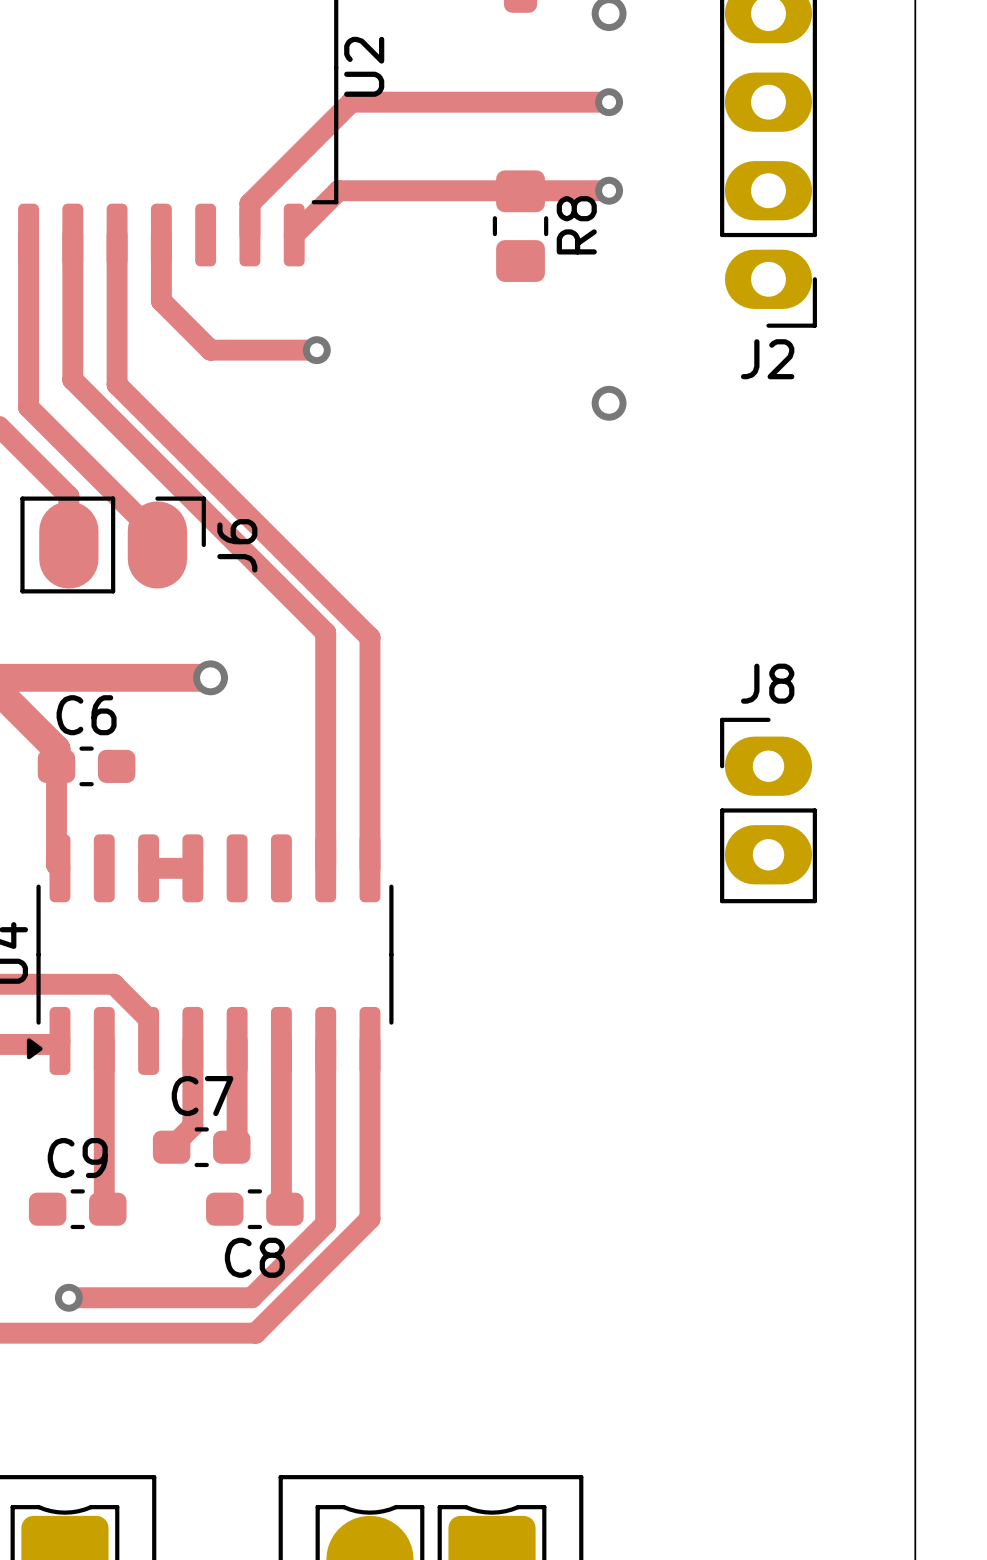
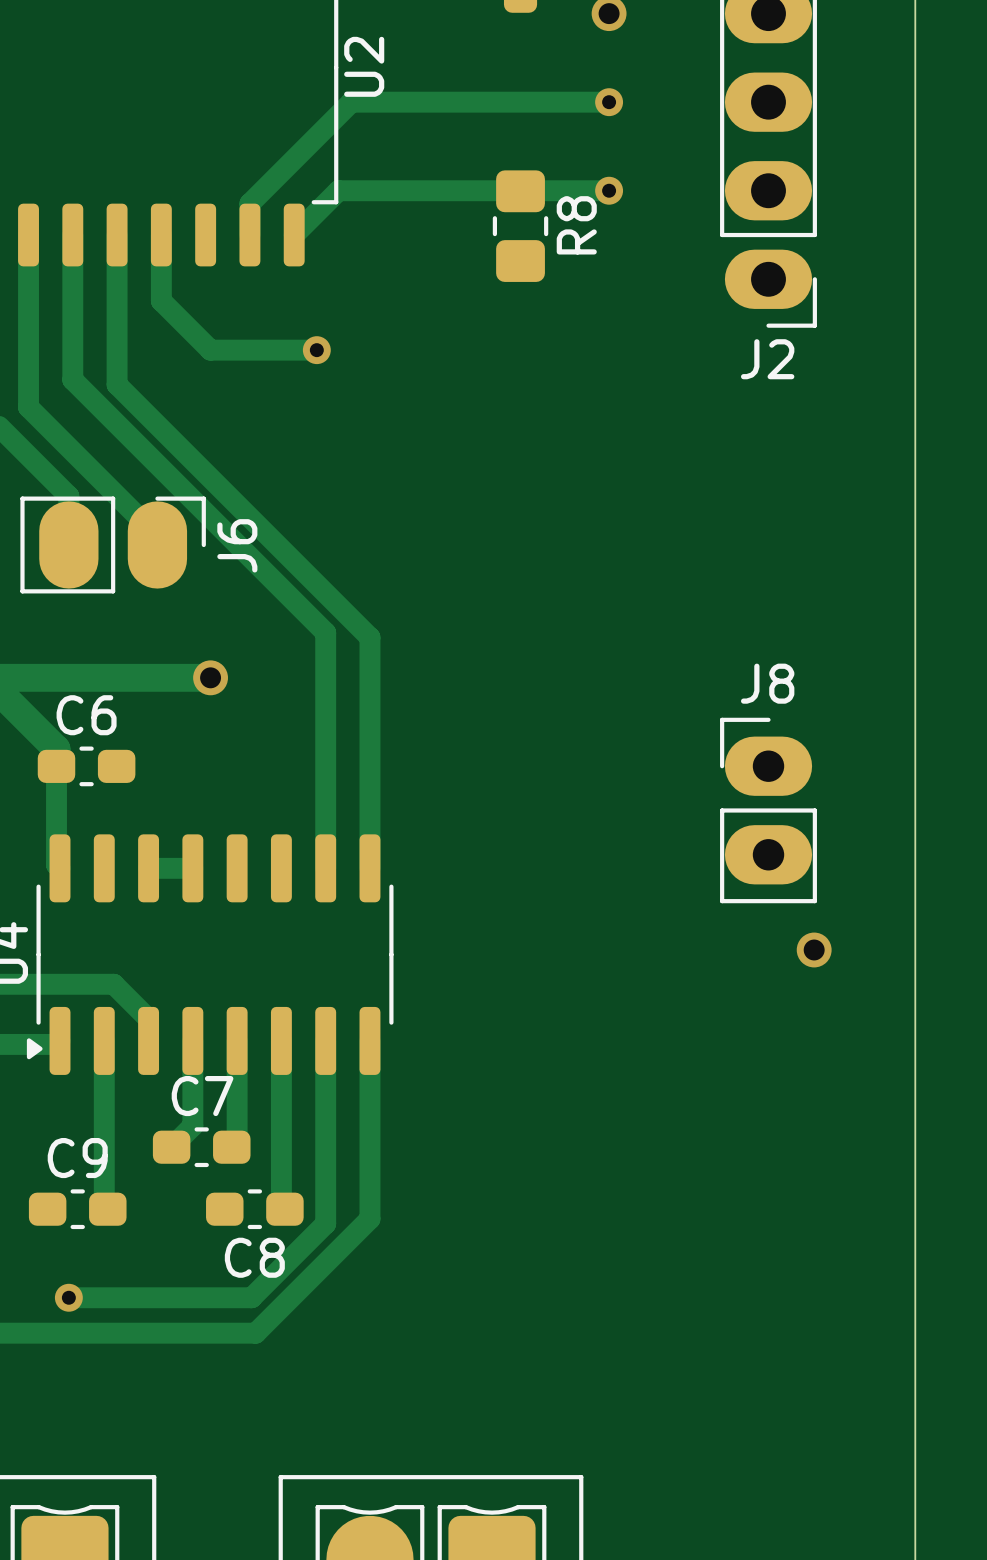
via: (609, 403) -> none
via: none -> (814, 950)

